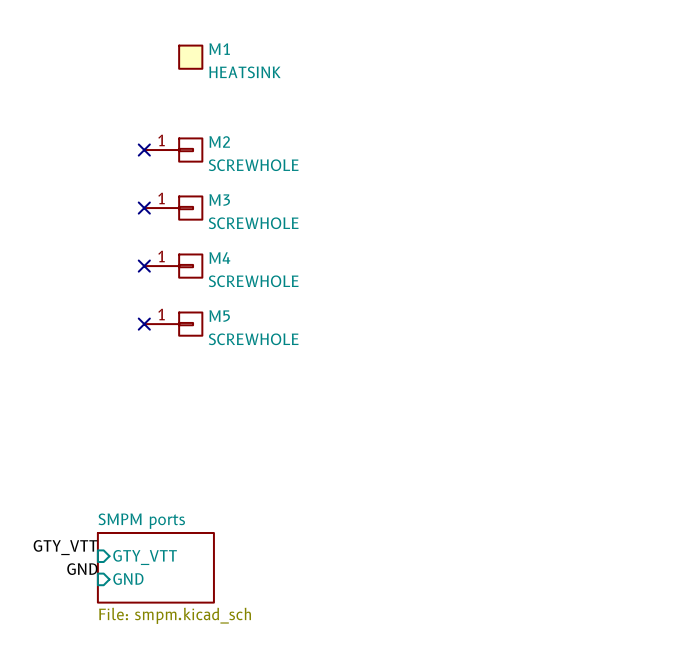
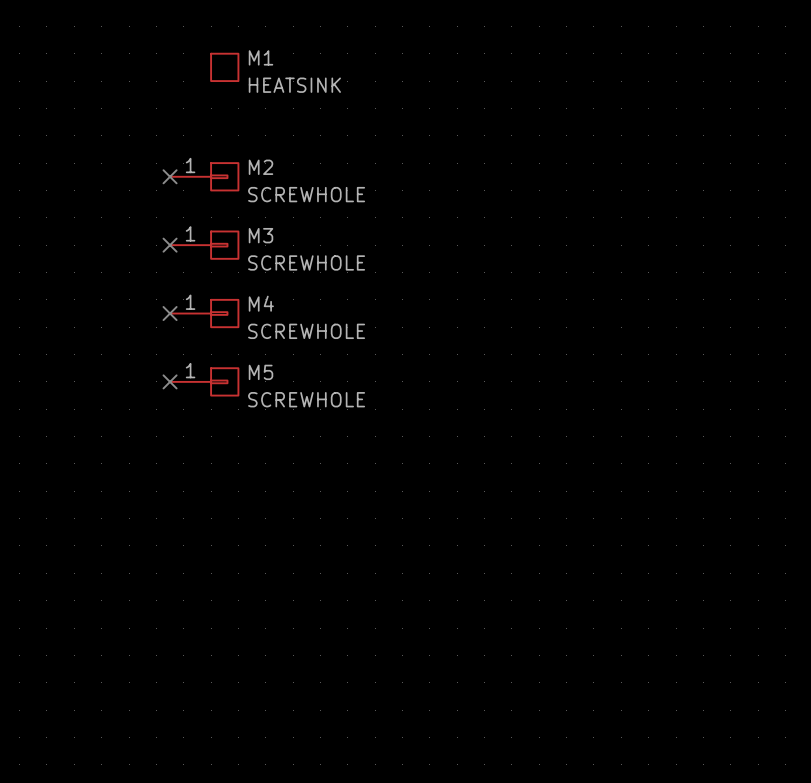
label: GTY_VTT (65, 547) -> none
sheet pin: GTY_VTT (145, 557) -> none
sheet SMPM ports: File: smpm.kicad_sch (155, 567) -> none
label: GND (82, 569) -> none
sheet pin: GND (128, 579) -> none

